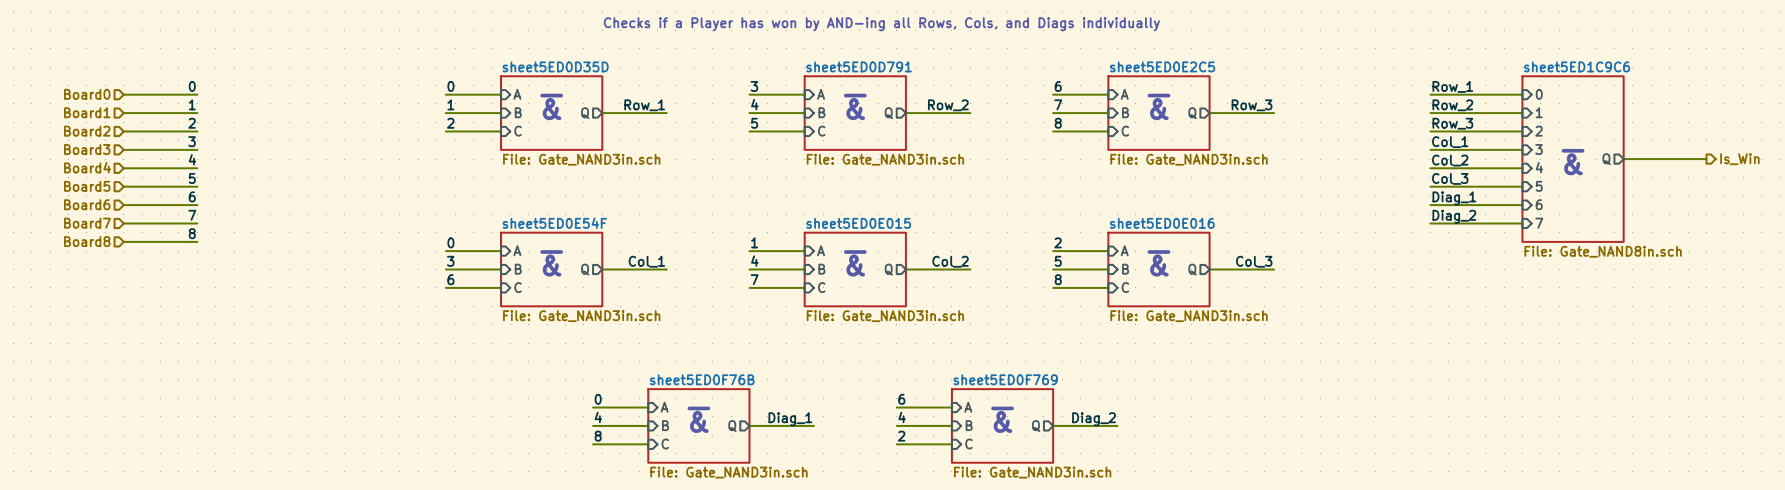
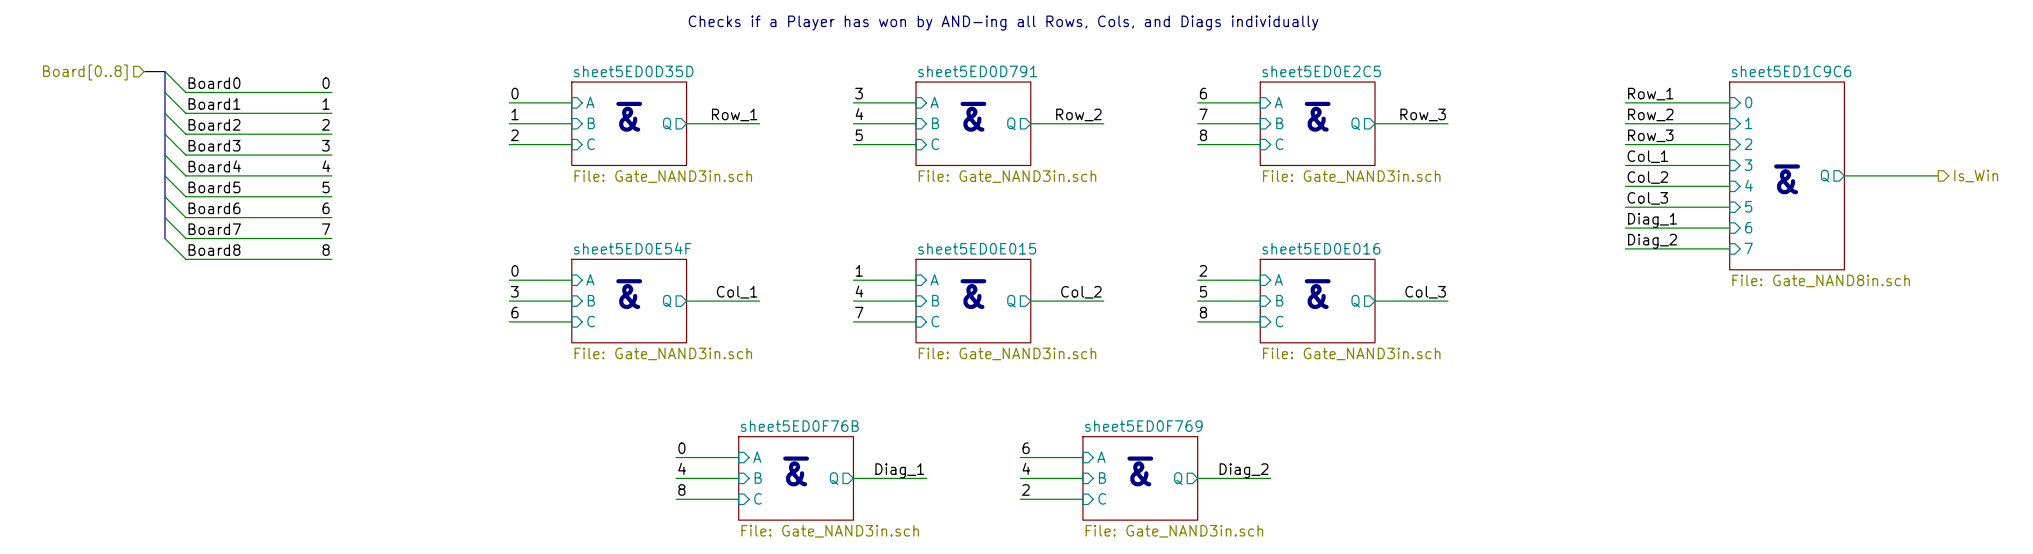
hierarchical label: none -> Board[0..8] (85, 72)
bus: none -> (144, 71) (164, 71) (164, 238)
wire: none -> (164, 71) (185, 92) (331, 92)
label: none -> Board0 (214, 83)
wire: none -> (164, 92) (185, 113) (331, 113)
label position: 0 (192, 86) -> 0 (326, 83)
hierarchical label: Board0 (87, 94) -> none
wire: (123, 94) (197, 94) -> none
label: none -> Board1 (214, 104)
wire: none -> (164, 113) (185, 134) (331, 134)
label position: 1 (192, 104) -> 1 (326, 104)
hierarchical label: Board1 (87, 112) -> none
wire: (123, 113) (197, 113) -> none
label: none -> Board2 (214, 124)
wire: none -> (164, 134) (185, 155) (331, 155)
label position: 2 (192, 123) -> 2 (325, 124)
hierarchical label: Board2 (87, 131) -> none
wire: (123, 131) (197, 131) -> none
label: none -> Board3 (214, 145)
wire: none -> (164, 155) (185, 175) (331, 175)
label position: 3 (192, 141) -> 3 (325, 145)
hierarchical label: Board3 (87, 149) -> none
wire: (123, 149) (197, 149) -> none
label: none -> Board4 (214, 166)
wire: none -> (164, 175) (185, 196) (331, 196)
label position: 4 (192, 159) -> 4 (326, 166)
hierarchical label: Board4 (87, 167) -> none
wire: (123, 168) (197, 168) -> none
label: none -> Board5 (214, 187)
wire: none -> (164, 196) (185, 217) (331, 217)
label position: 5 (192, 178) -> 5 (326, 187)
hierarchical label: Board5 (87, 186) -> none
wire: (123, 186) (197, 186) -> none
label: none -> Board6 (214, 208)
wire: none -> (164, 217) (185, 238) (331, 238)
label position: 6 (192, 196) -> 6 (326, 208)
hierarchical label: Board6 (87, 204) -> none
wire: (123, 205) (197, 205) -> none
label: none -> Board7 (214, 229)
wire: none -> (164, 238) (185, 259) (331, 259)
label position: 7 (192, 215) -> 7 (326, 229)
hierarchical label: Board7 (87, 223) -> none
wire: (123, 223) (197, 223) -> none
label: none -> Board8 (214, 250)
label position: 8 (192, 233) -> 8 (326, 250)
hierarchical label: Board8 (87, 241) -> none
wire: (123, 241) (197, 241) -> none

